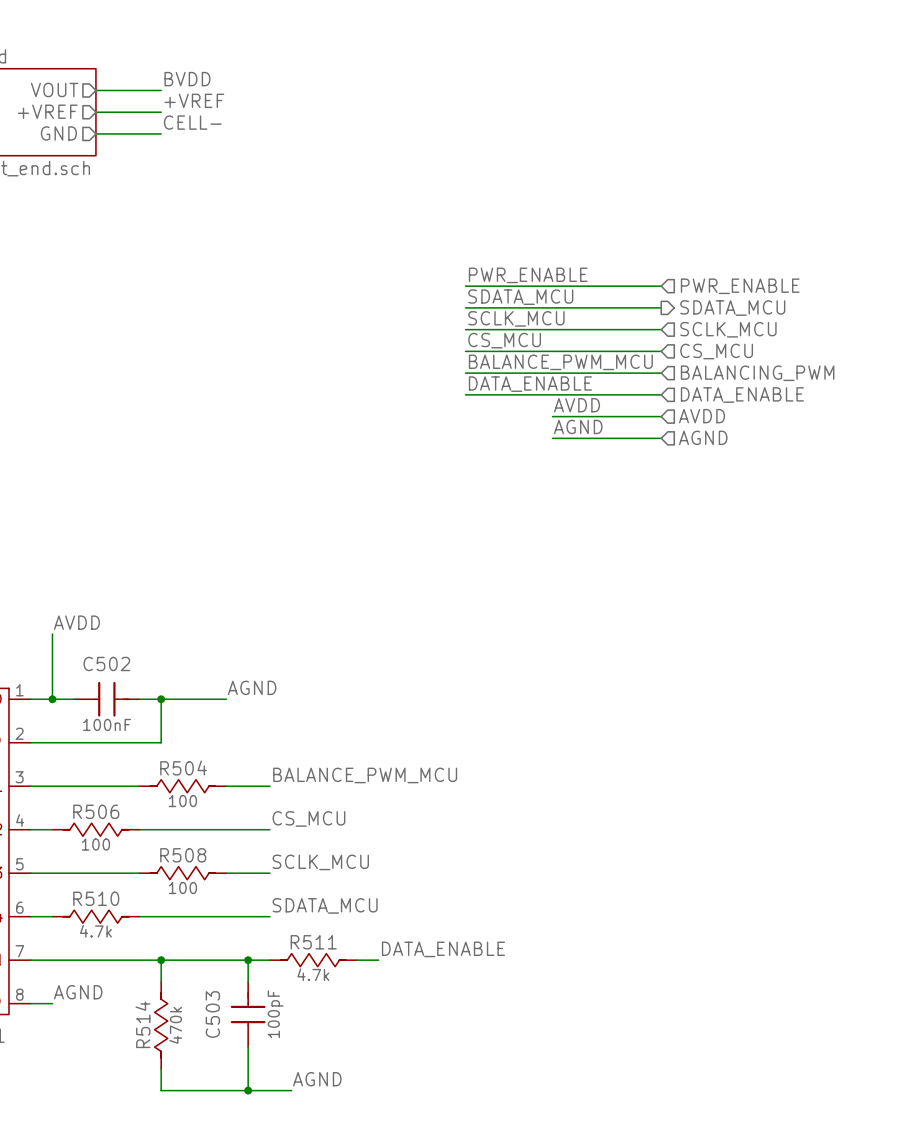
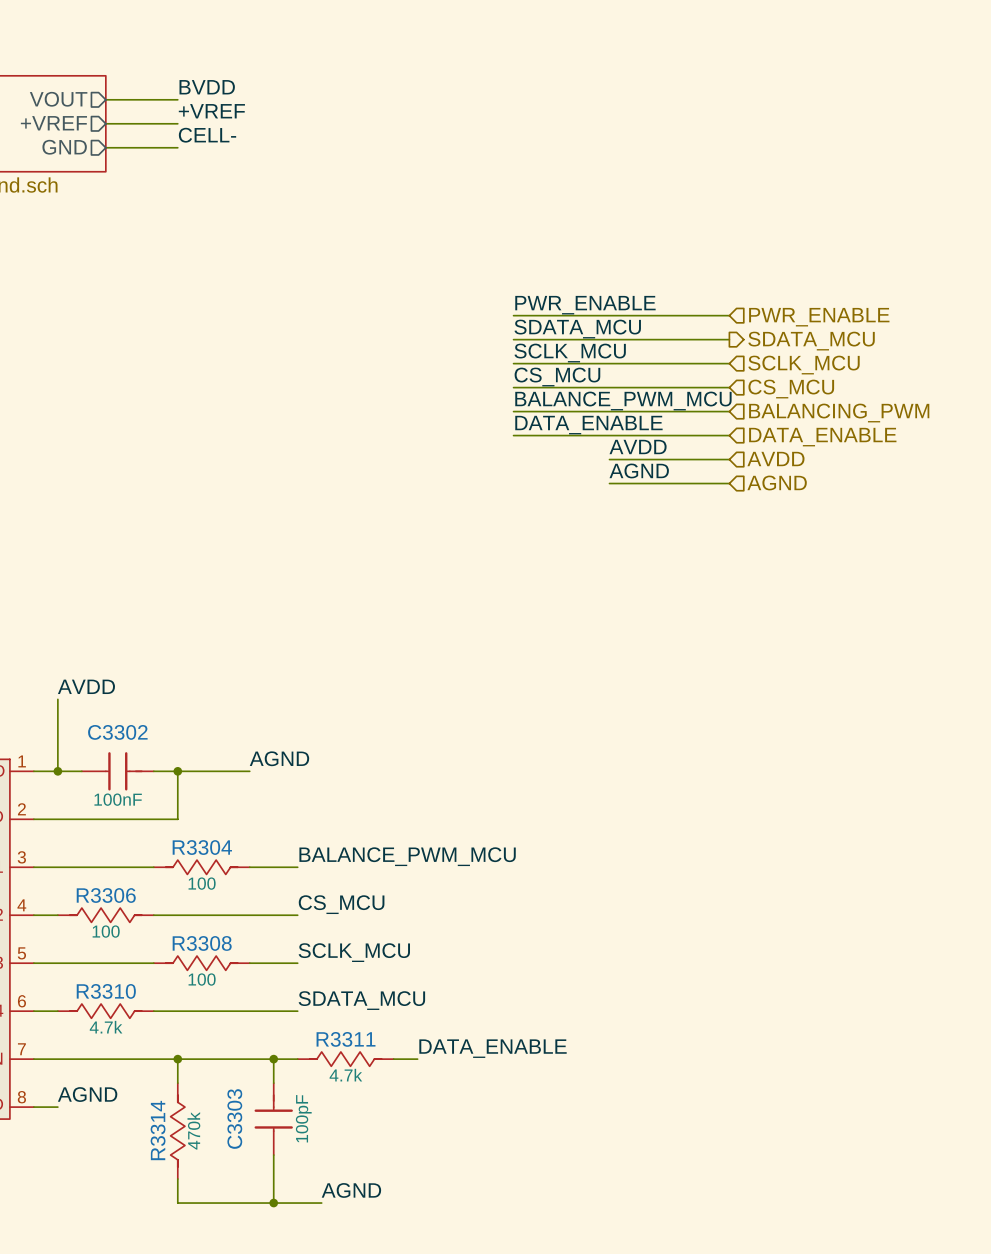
C502 name: C502 (106, 663) -> C3302 (117, 732)
R504 name: R504 (183, 768) -> R3304 (202, 847)
R506 name: R506 (96, 811) -> R3306 (106, 895)
R508 name: R508 (183, 855) -> R3308 (202, 943)
R510 name: R510 (96, 898) -> R3310 (106, 991)
R511 name: R511 (313, 942) -> R3311 (346, 1039)
C503 name: C503 (212, 1014) -> C3303 (234, 1119)
R514 name: R514 (142, 1024) -> R3314 (158, 1130)

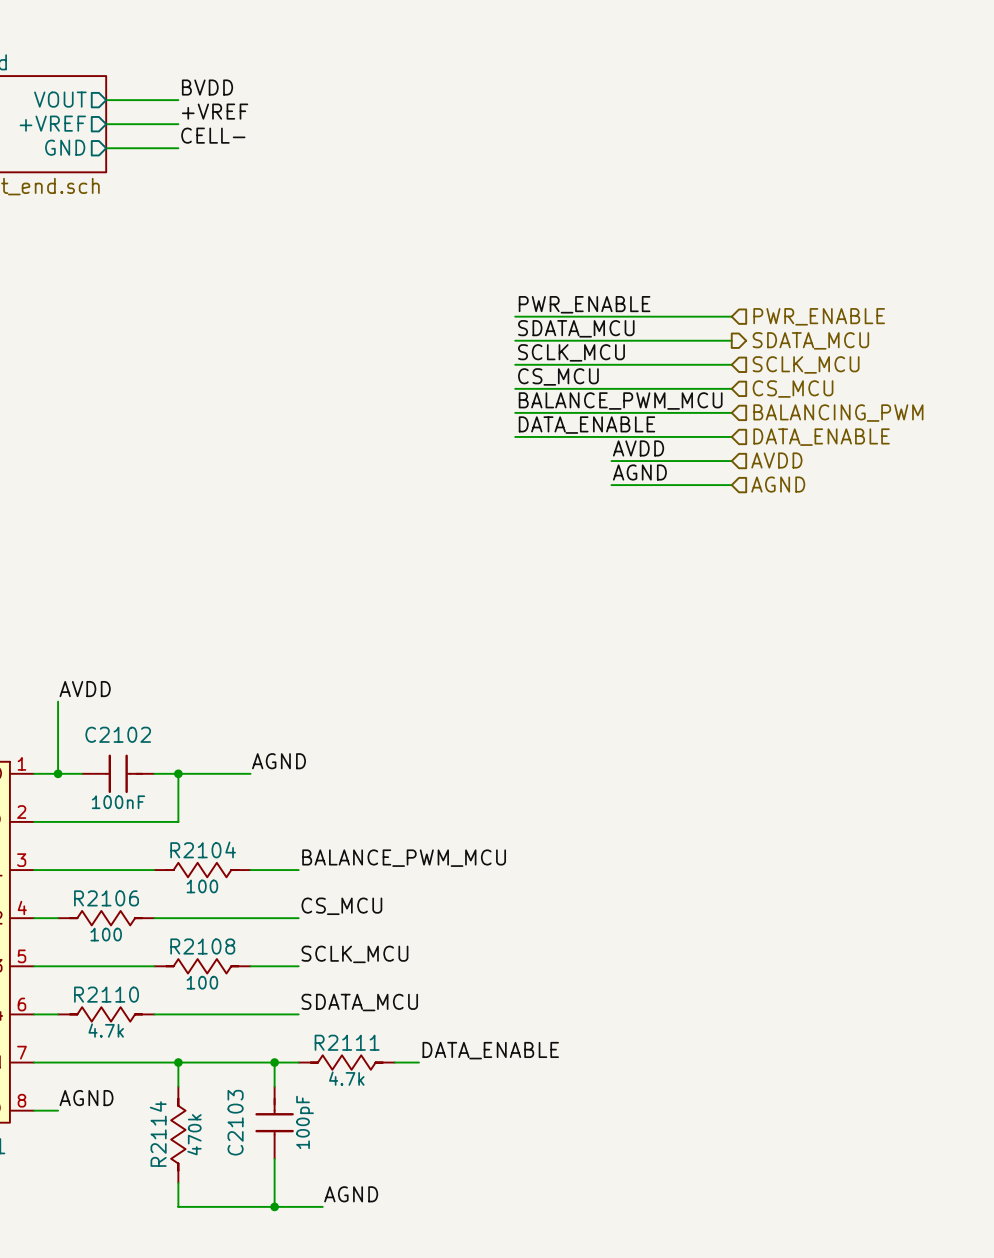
C3302 name: C3302 (117, 732) -> C2102 (118, 734)
R3304 name: R3304 (202, 847) -> R2104 (203, 849)
R3306 name: R3306 (106, 895) -> R2106 (106, 898)
R3308 name: R3308 (202, 943) -> R2108 (202, 946)
R3310 name: R3310 (106, 991) -> R2110 (106, 994)
R3311 name: R3311 (346, 1039) -> R2111 (347, 1042)
C3303 name: C3303 (234, 1119) -> C2103 (235, 1122)
R3314 name: R3314 (158, 1130) -> R2114 (158, 1134)

